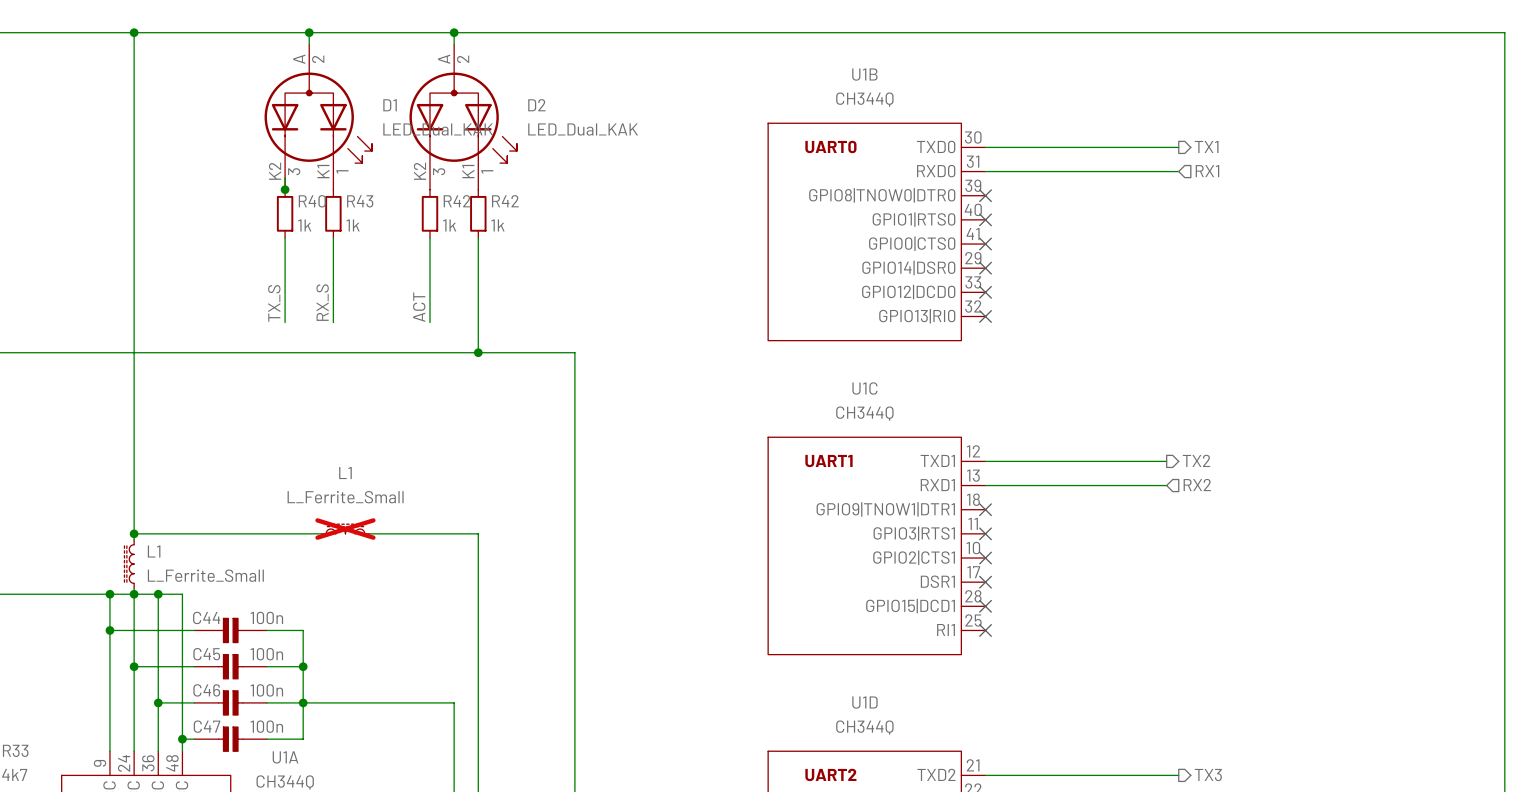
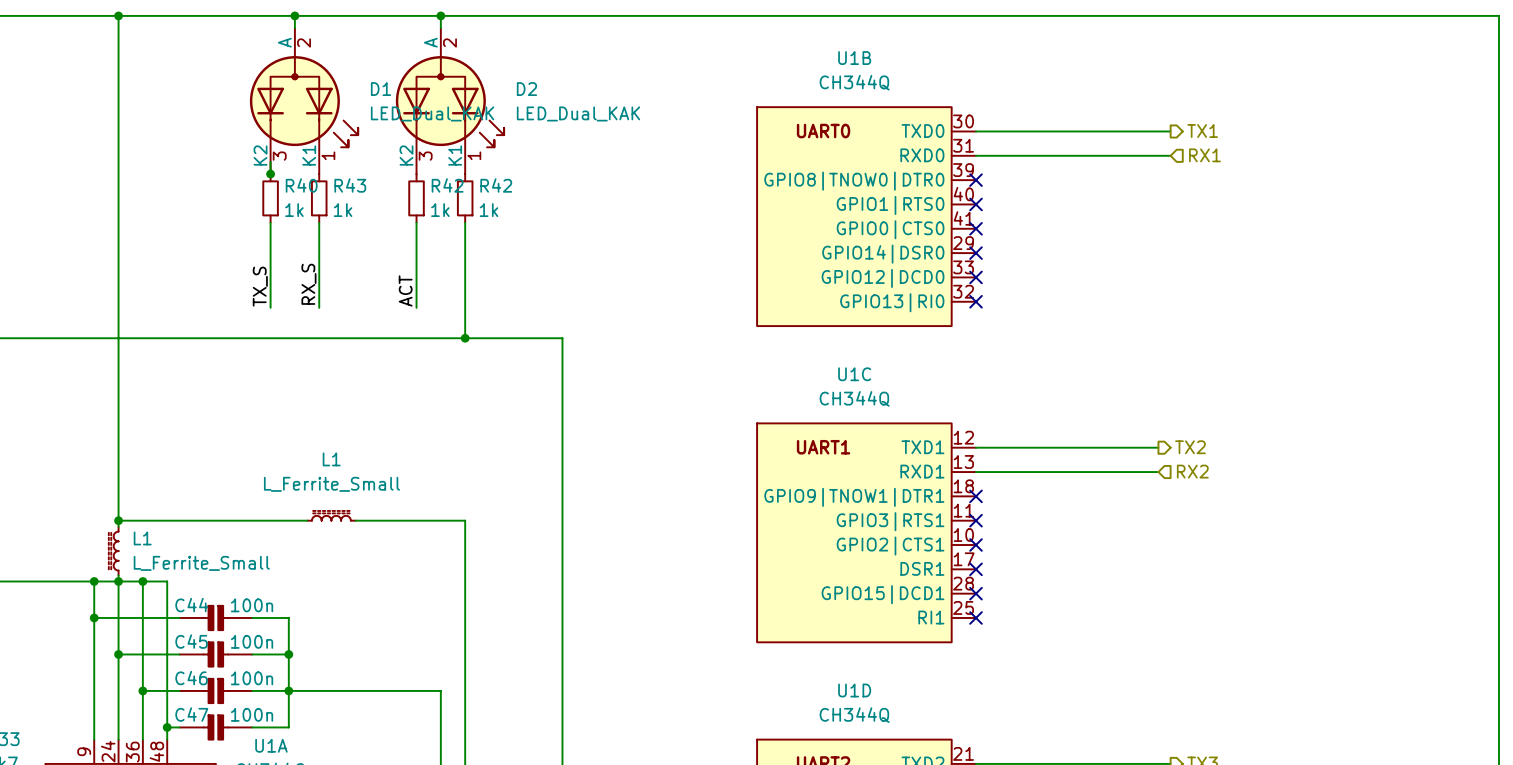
L1 do-not-place cross: (345, 529) -> none

